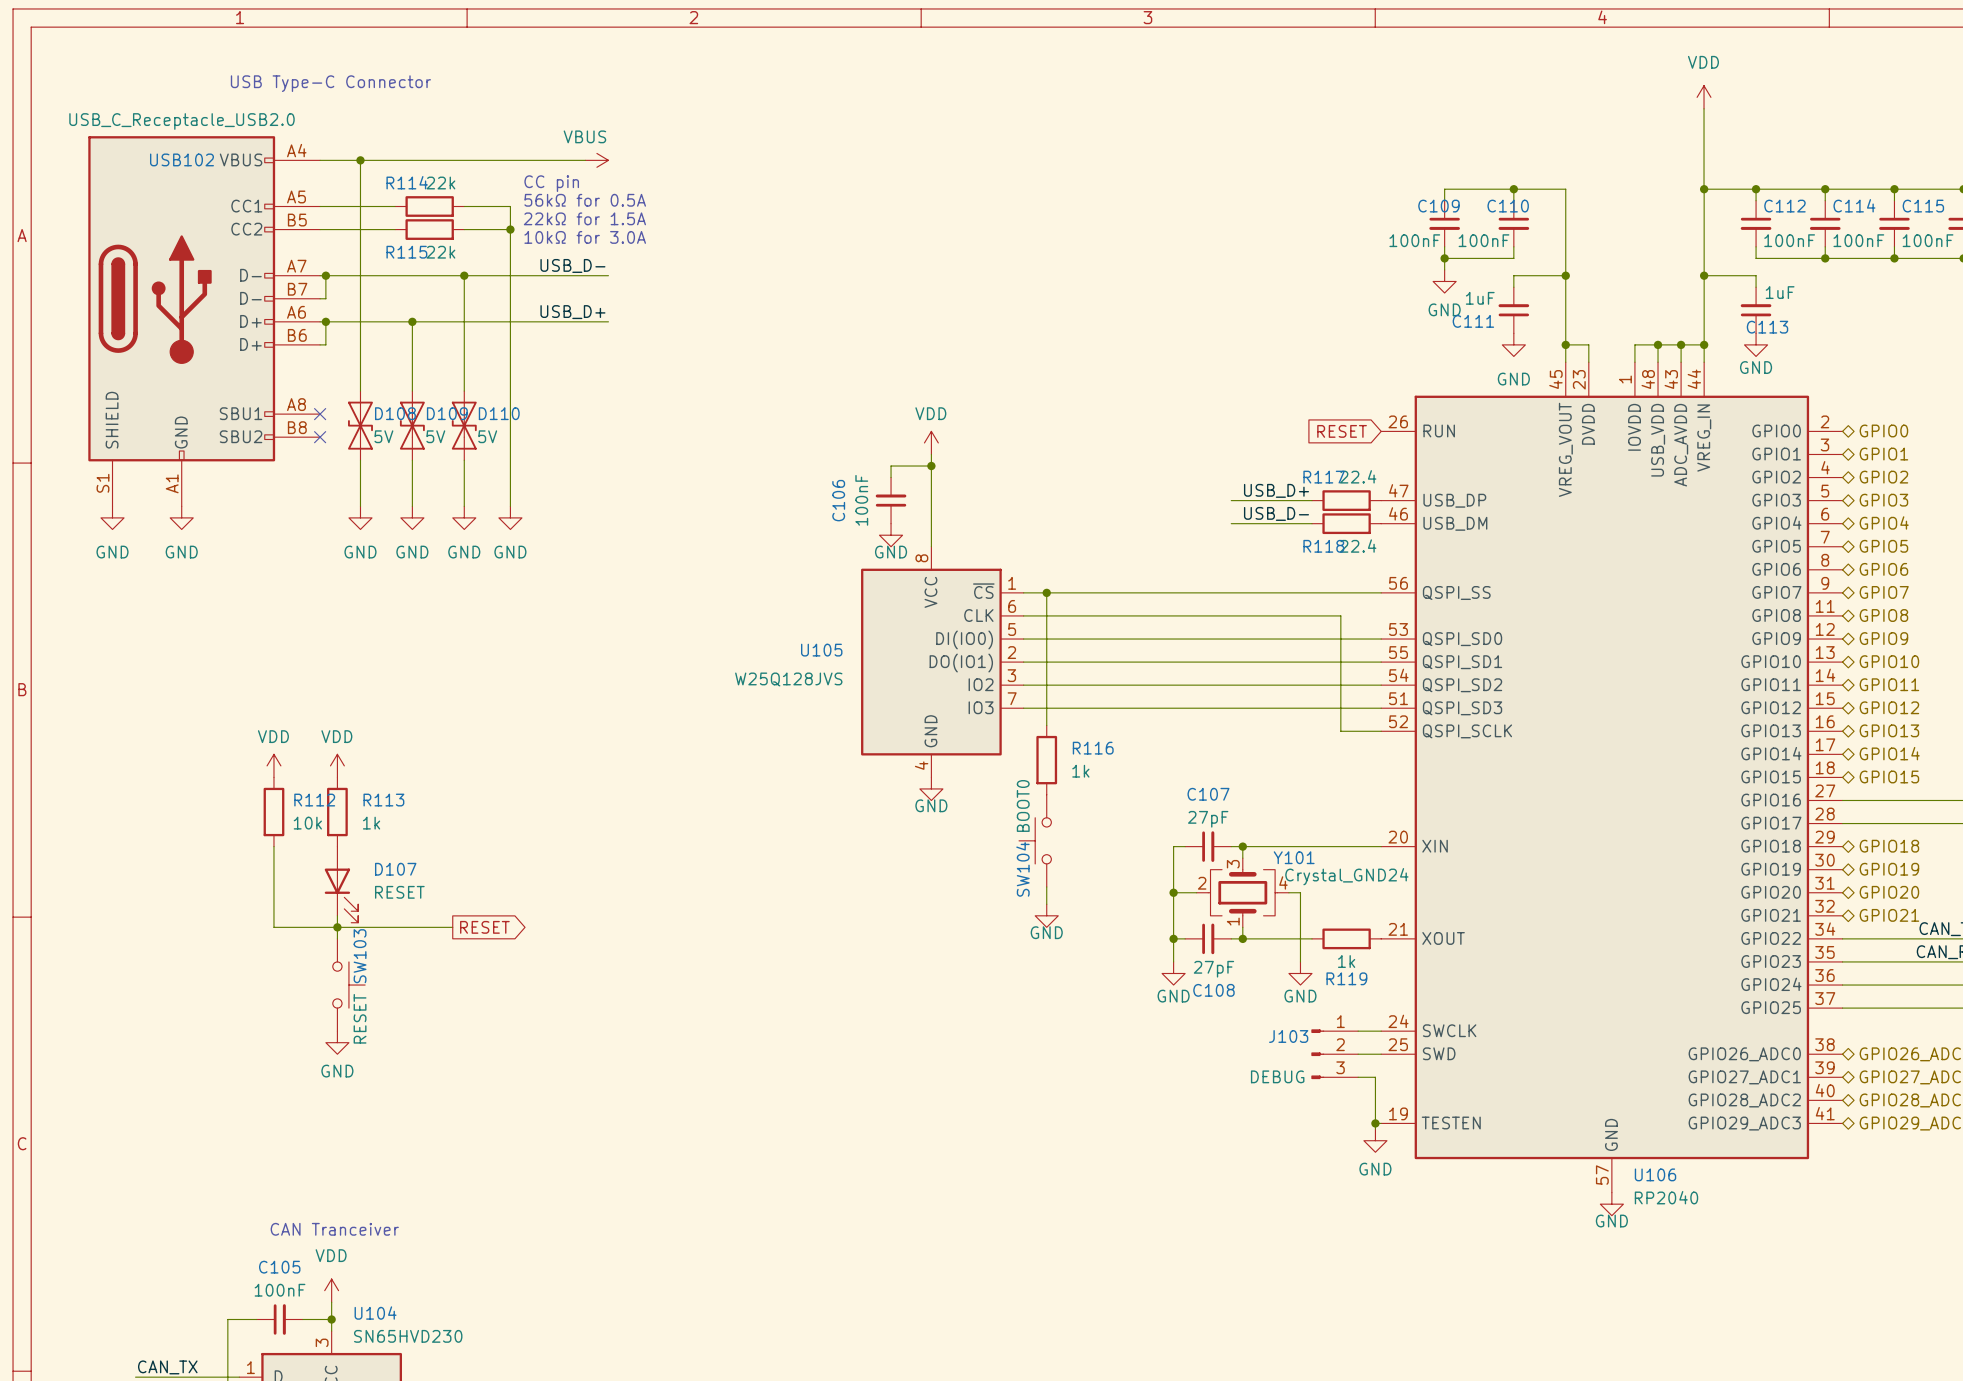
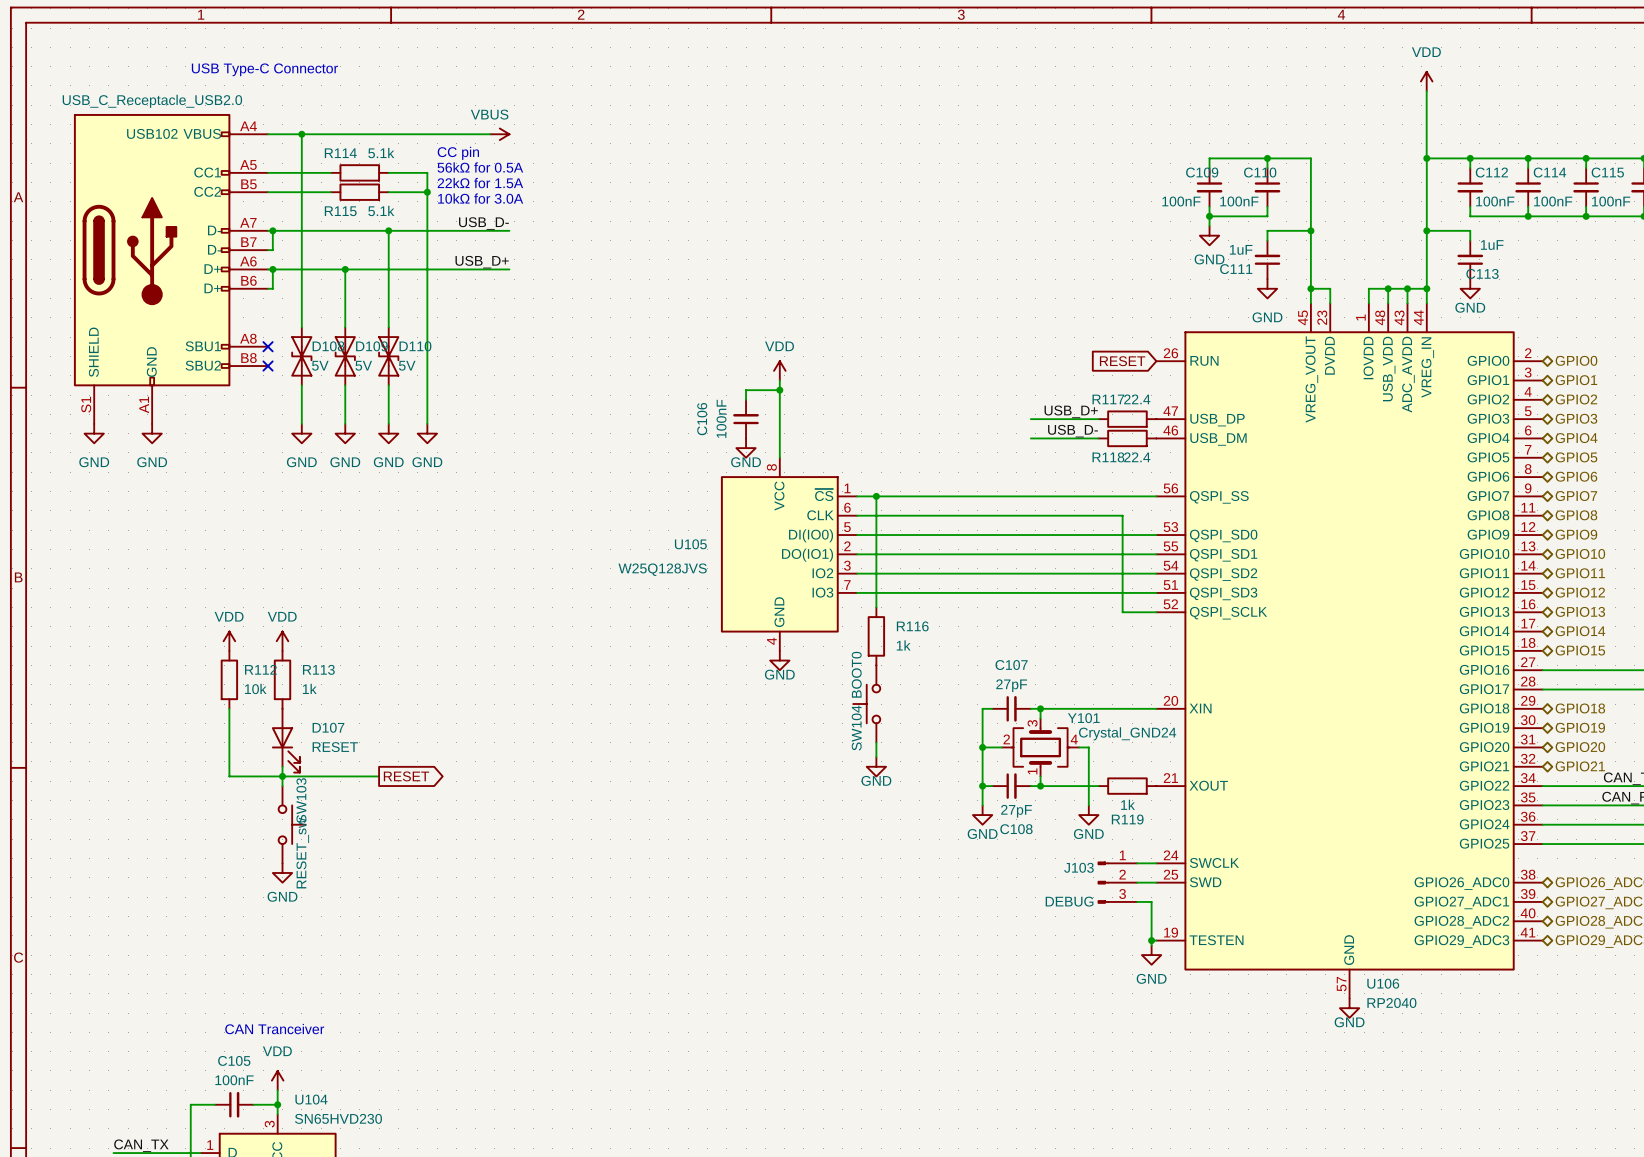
R114 value: 22k (440, 183) -> 5.1k (381, 153)
R115 value: 22k (440, 252) -> 5.1k (381, 210)
SW103 value: RESET (360, 1018) -> RESET_sw (302, 853)

